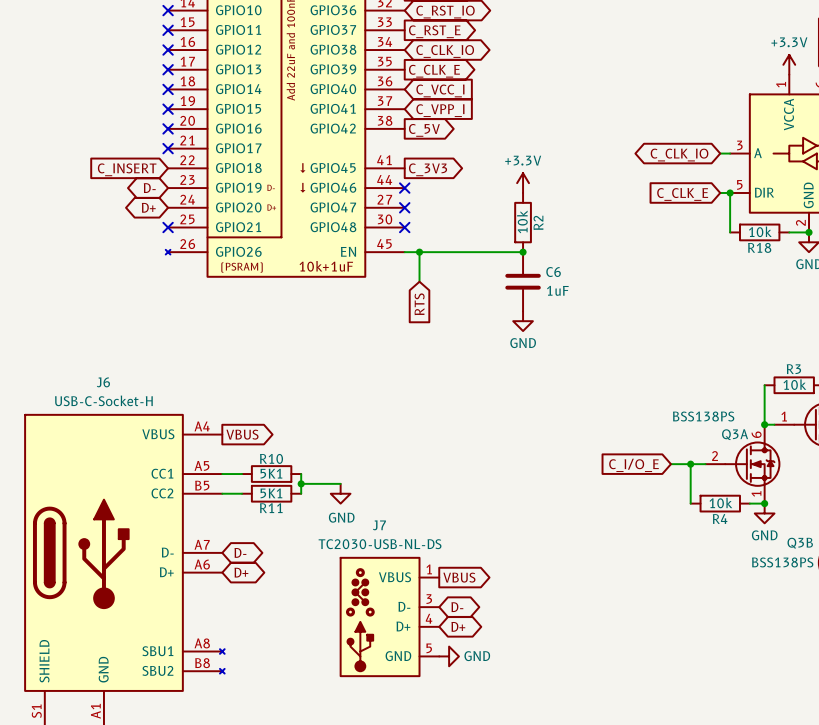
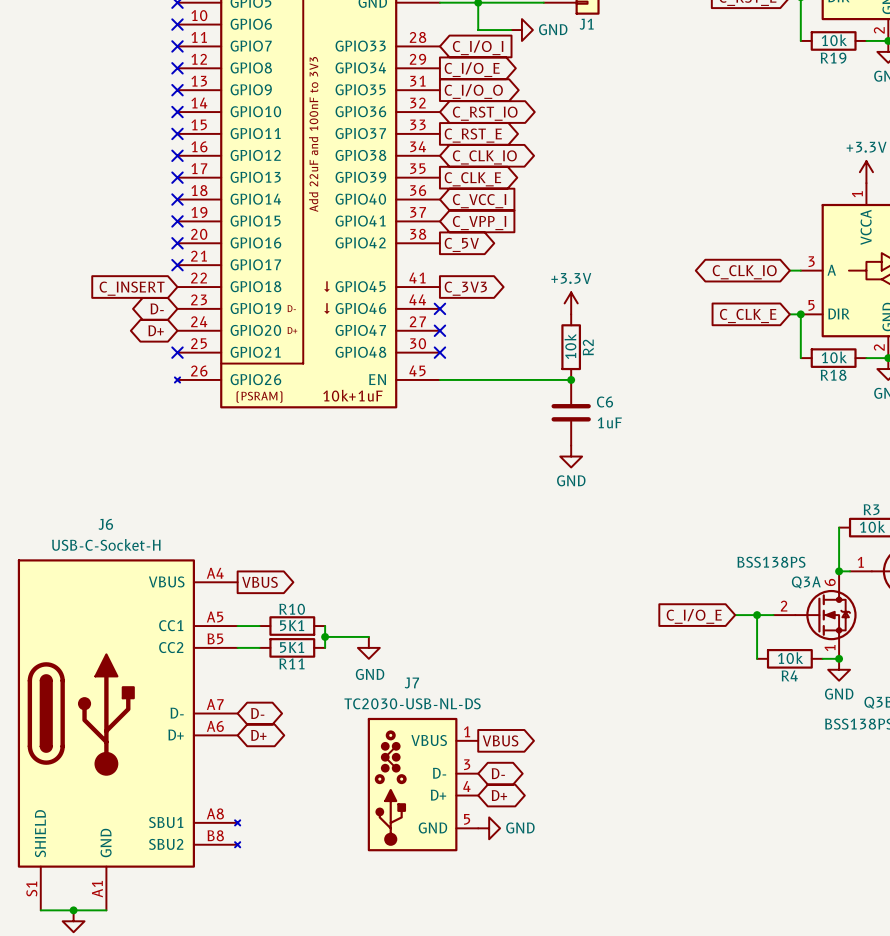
wire: (419, 252) (419, 281) -> none
junction: (419, 252) -> none
global label: RTS (419, 304) -> none

